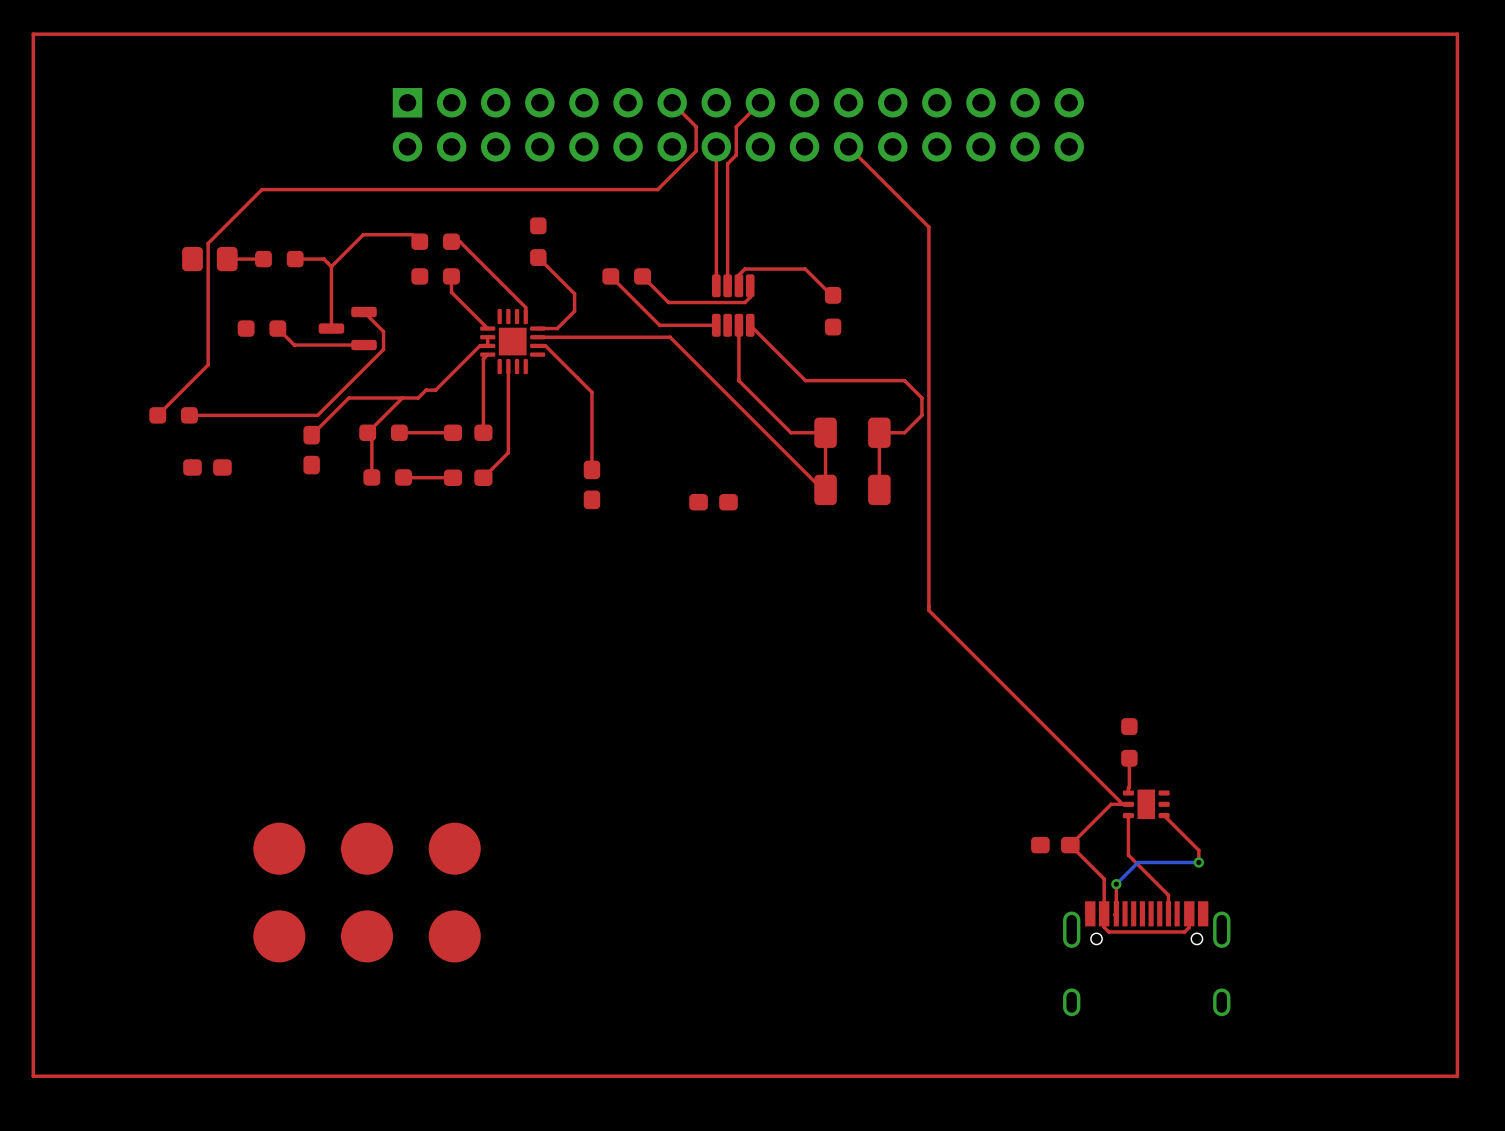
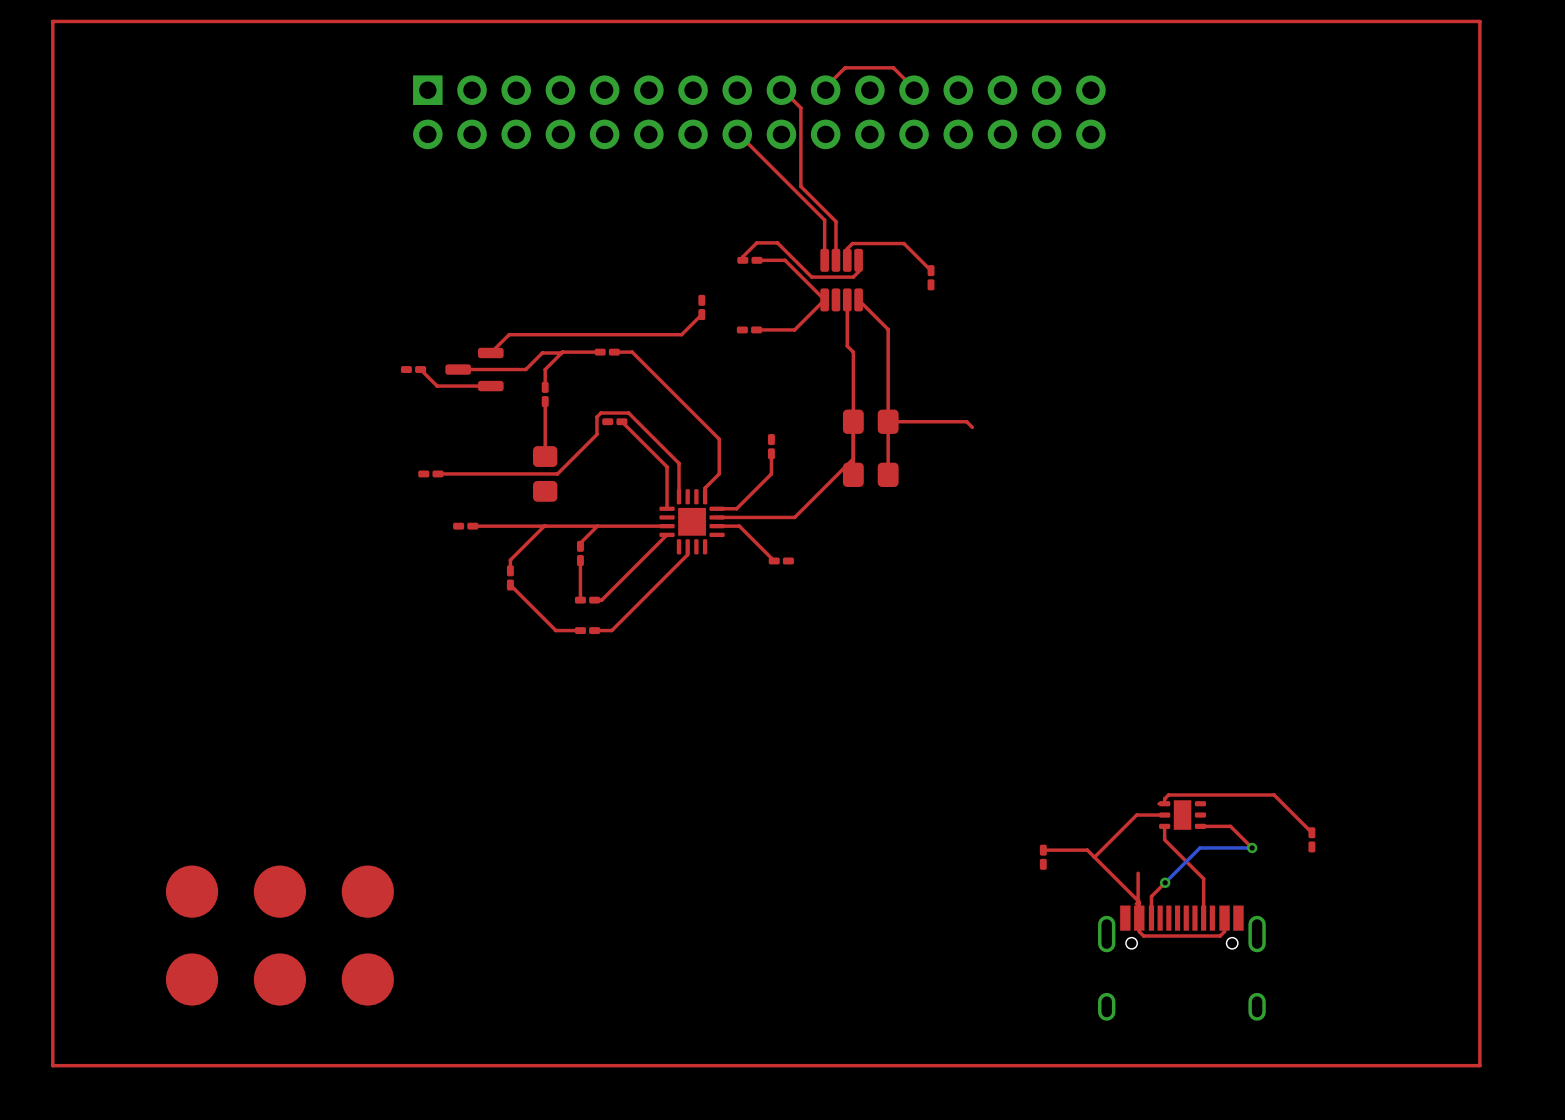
top track: none -> (780, 87) (800, 107) (800, 186) (835, 221) (835, 260)
top track: none -> (913, 87) (893, 67) (845, 67) (825, 87)
top track: (672, 102) (696, 126) (696, 151) (657, 189) (261, 189) (208, 243) (208, 365) (157, 415) -> none
top track: (760, 102) (736, 126) (736, 155) (727, 163) (727, 285) -> none
top track: none -> (736, 132) (824, 220) (824, 260)
top track: (716, 146) (716, 285) -> none
top track: (848, 146) (928, 227) (928, 610) (1122, 804) -> none
top track: (419, 241) (412, 234) (363, 234) (331, 266) -> none
part: (435, 241) -> none
top track: (451, 241) (459, 241) (525, 307) (525, 316) -> none
part: (538, 241) -> none
top track: (538, 257) (574, 293) (574, 311) (557, 328) (537, 328) -> none
part rotation: 0° (209, 259) -> 90° clockwise (545, 473)
part position: (209, 259) -> (545, 473)
top track: (263, 259) (227, 259) -> none
part: (279, 259) -> none
top track: (295, 259) (323, 259) (331, 266) -> none
top track: (331, 266) (331, 328) -> none
part: none -> (749, 260)
top track: none -> (756, 260) (785, 260) (824, 299) (794, 329) (756, 329)
top track: none -> (847, 260) (847, 248) (852, 243) (903, 243) (931, 270)
top track: none -> (858, 260) (858, 271) (853, 277) (811, 277) (777, 242) (756, 242) (742, 256) (742, 260)
part: (435, 276) -> none
top track: (451, 276) (451, 292) (487, 328) -> none
top track: (610, 276) (659, 325) (716, 325) -> none
part: (626, 276) -> none
top track: (642, 276) (668, 302) (744, 302) (750, 297) (750, 285) -> none
top track: (738, 285) (738, 275) (744, 269) (805, 269) (830, 293) -> none
part: none -> (931, 277)
part position: (733, 305) -> (841, 280)
part: (833, 311) -> none
top track: (364, 312) (383, 331) (383, 349) (317, 415) (189, 415) -> none
top track: none -> (847, 299) (847, 346) (853, 352) (853, 474)
top track: none -> (858, 299) (888, 329) (888, 474) (884, 478)
part: none -> (701, 307)
top track: (738, 325) (738, 380) (790, 432) (825, 432) (825, 489) (822, 489) (670, 337) (537, 337) -> none
top track: (750, 325) (805, 380) (904, 380) (921, 398) (921, 415) (904, 432) (879, 432) (879, 489) -> none
top track: none -> (701, 314) (681, 334) (509, 334) (490, 352)
part: (261, 328) -> none
top track: (277, 328) (294, 345) (364, 345) -> none
part position: (347, 328) -> (474, 369)
top track: (487, 337) (487, 345) (479, 345) (435, 390) (426, 390) (418, 398) -> (490, 386) (438, 386)
part position: (512, 341) -> (692, 521)
part: none -> (749, 329)
top track: (537, 345) (545, 345) (591, 392) (591, 469) -> none
top track: (487, 354) (483, 358) (483, 432) -> none
top track: none -> (600, 352) (562, 352) (545, 369) (545, 387)
part: none -> (607, 352)
top track: none -> (614, 352) (632, 352) (719, 439) (719, 473) (705, 488) (705, 496)
top track: none -> (561, 352) (542, 352) (525, 369) (458, 369)
top track: (508, 366) (508, 452) (483, 477) -> none
part: none -> (413, 369)
top track: (402, 398) (367, 432) (371, 436) (371, 477) -> none
top track: (416, 398) (348, 398) (311, 435) -> (437, 386) (420, 369)
part: none -> (545, 394)
top track: none -> (545, 401) (545, 456)
part: (173, 415) -> none
part footprint: [814, 417, 891, 448] -> [842, 409, 899, 434]
part: (383, 432) -> none
top track: (453, 432) (399, 432) -> none
part: (468, 432) -> none
part: none -> (614, 421)
top track: none -> (621, 421) (667, 466) (667, 508)
top track: none -> (888, 421) (966, 421) (972, 427)
part: (311, 450) -> none
part: none -> (771, 446)
top track: none -> (771, 453) (771, 473) (736, 508) (717, 508)
part: (207, 467) -> none
top track: none -> (853, 458) (794, 517) (717, 517)
part footprint: [814, 474, 891, 506] -> [842, 462, 899, 488]
part: (387, 477) -> none
top track: (403, 477) (453, 477) -> none
part: (468, 477) -> none
part: (591, 484) -> none
part: none -> (430, 473)
top track: none -> (437, 473) (557, 473) (596, 434) (596, 417) (601, 413) (628, 413) (678, 463) (678, 496)
part: (713, 502) -> none
part: none -> (465, 526)
top track: none -> (545, 526) (510, 560) (510, 570)
top track: none -> (597, 526) (580, 543)
top track: none -> (667, 526) (472, 526)
top track: none -> (717, 526) (739, 526) (774, 560)
top track: none -> (667, 534) (601, 600) (594, 600)
top track: none -> (687, 546) (687, 554) (611, 630) (594, 630)
part: none -> (580, 553)
top track: none -> (580, 560) (580, 600)
part: none -> (781, 560)
part: none -> (510, 577)
top track: none -> (510, 585) (555, 630) (580, 630)
part: none -> (587, 600)
part: none -> (587, 630)
part: (1129, 742) -> none
top track: (1129, 758) (1128, 793) -> none
top track: (1128, 804) (1111, 804) (1070, 845) (1104, 878) (1104, 927) (1108, 931) (1184, 931) (1189, 927) (1189, 913) -> none
part position: (1146, 804) -> (1182, 815)
top track: none -> (1159, 803) (1164, 803) (1164, 798) (1168, 795) (1274, 795) (1311, 832)
top track: (1128, 815) (1128, 855) (1168, 895) (1168, 913) -> none
top track: (1164, 815) (1198, 850) (1198, 862) -> none
top track: none -> (1164, 815) (1136, 815) (1094, 857)
top track: none -> (1164, 826) (1164, 839) (1203, 878) (1203, 918)
top track: none -> (1200, 826) (1230, 826) (1252, 847)
part: (1055, 845) -> none
part: (279, 848) -> none
part: (367, 848) -> none
part: (454, 848) -> none
part: none -> (1311, 839)
bottom track: none -> (1252, 847) (1199, 847) (1165, 882)
top track: none -> (1043, 850) (1087, 850) (1139, 902) (1139, 931) (1143, 935) (1220, 935) (1224, 931) (1224, 918)
bottom track: (1198, 862) (1138, 862) (1116, 884) -> none
via position: (1198, 862) -> (1252, 847)
part: none -> (1043, 857)
via position: (1116, 884) -> (1165, 882)
top track: none -> (1165, 882) (1151, 896) (1151, 918)
part: none -> (192, 891)
part: none -> (279, 891)
part: none -> (367, 891)
part: (279, 936) -> none
part: (367, 936) -> none
part: (454, 936) -> none
part position: (1146, 958) -> (1181, 963)
part: none -> (192, 979)
part: none -> (279, 979)
part: none -> (367, 979)

